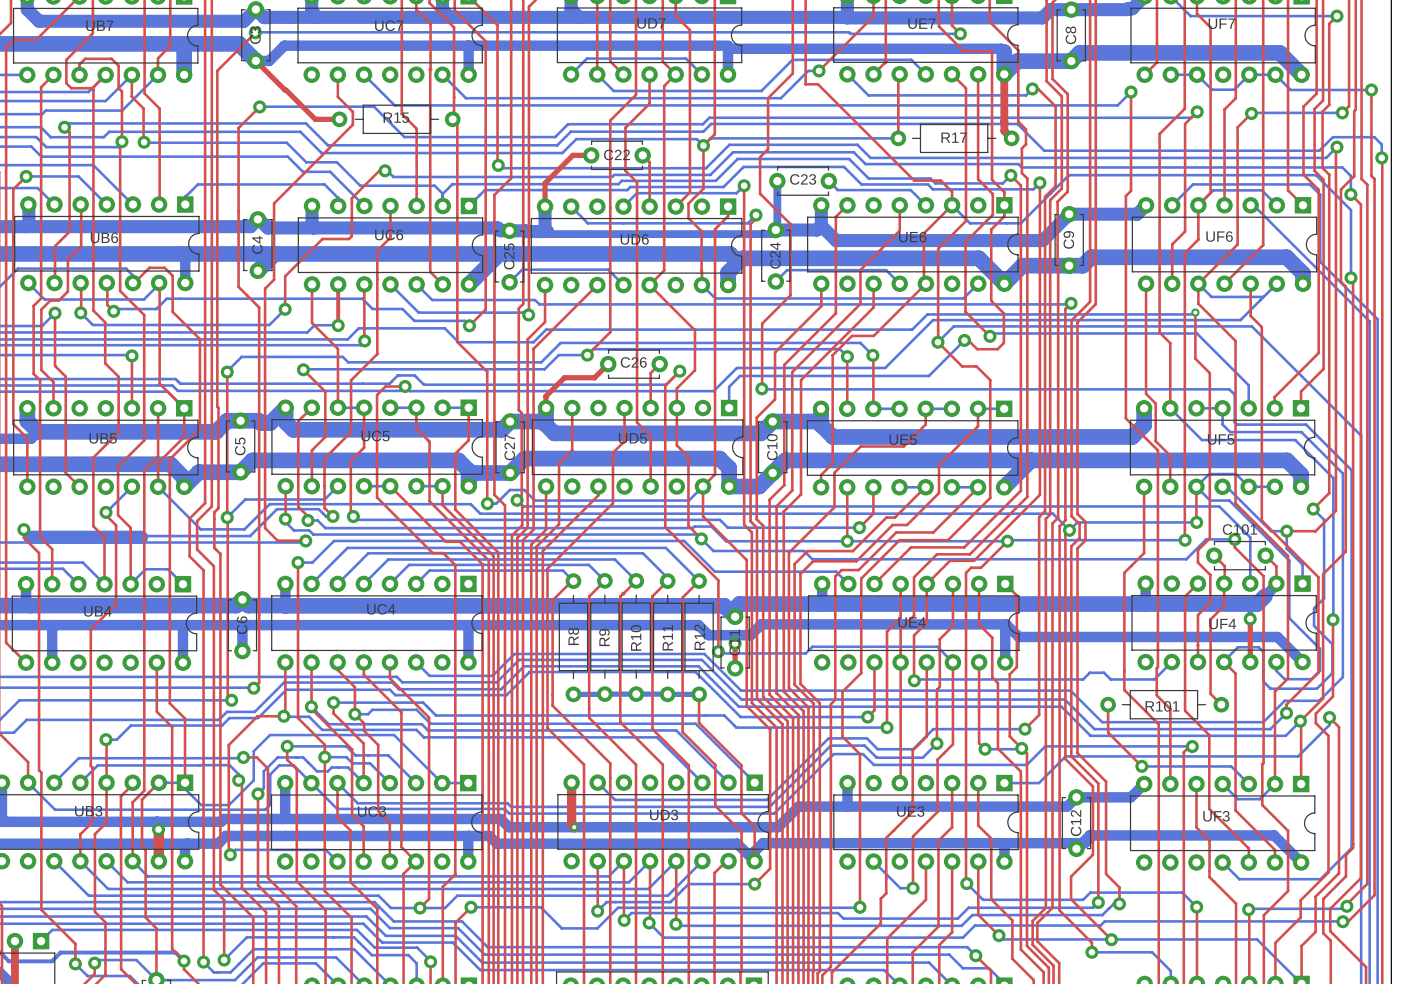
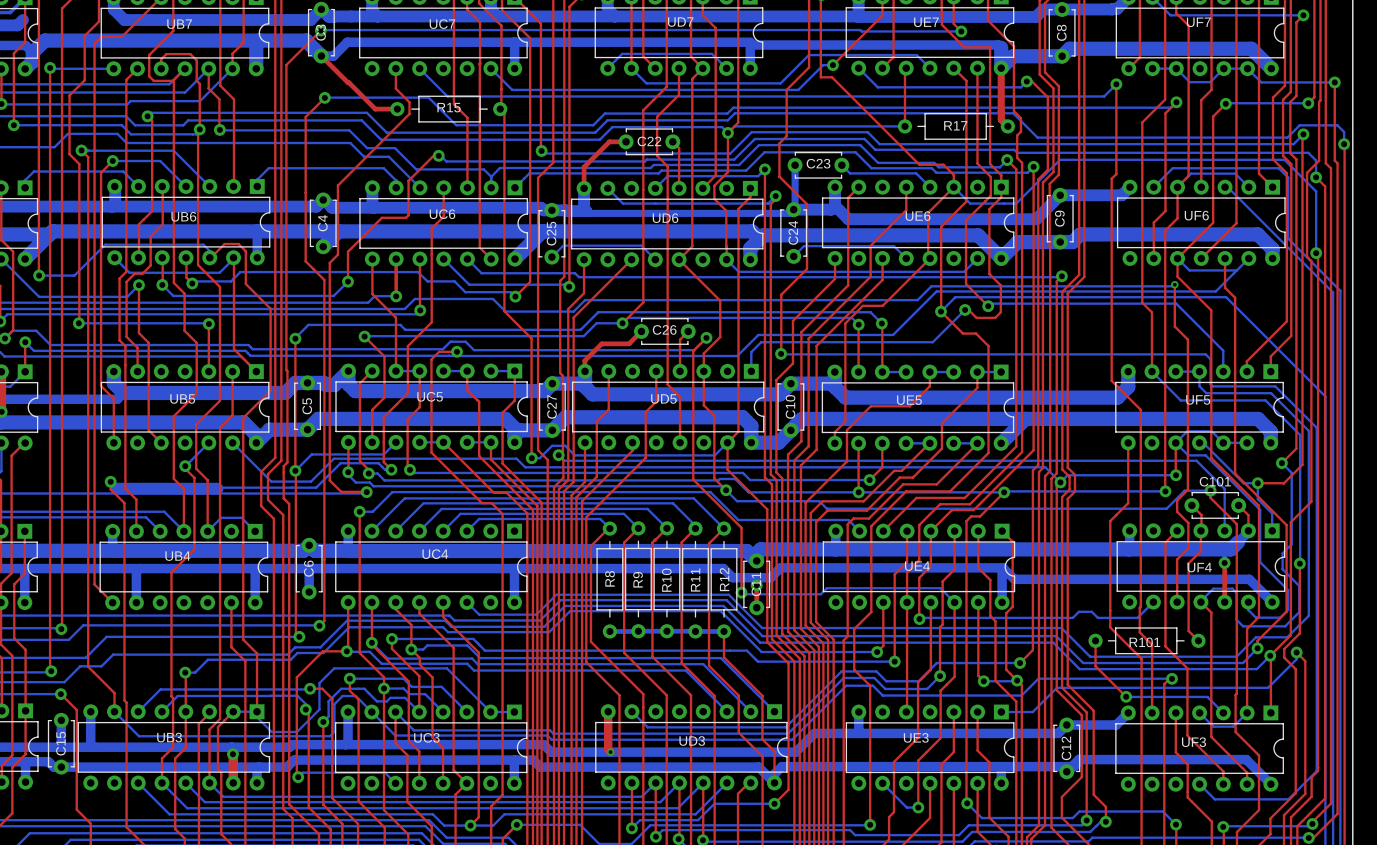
top track: (1146, 283) (1146, 393) (1155, 403) (1155, 441) (1170, 455) (1170, 486) -> none
top track: (184, 408) (184, 436) (158, 463) (158, 486) -> none

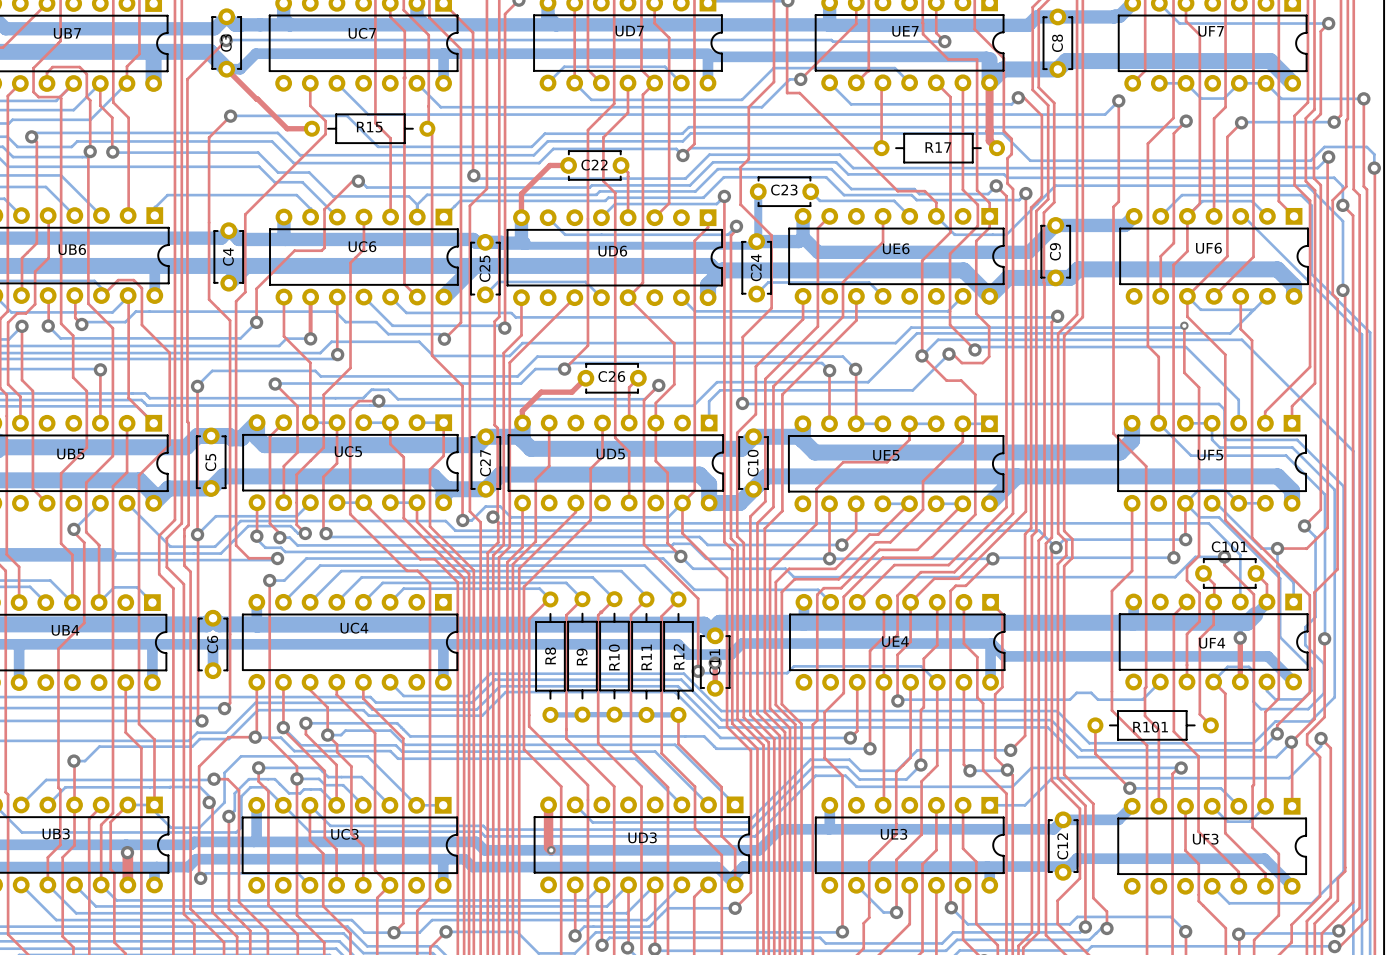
top track: (727, 132) (727, 172) (714, 185) (714, 198) (726, 210) (726, 259) -> none
top track: (953, 187) (928, 212) (928, 256) (930, 258) (882, 305) (862, 305) (845, 323) (845, 421) (834, 432) (834, 443) -> none

